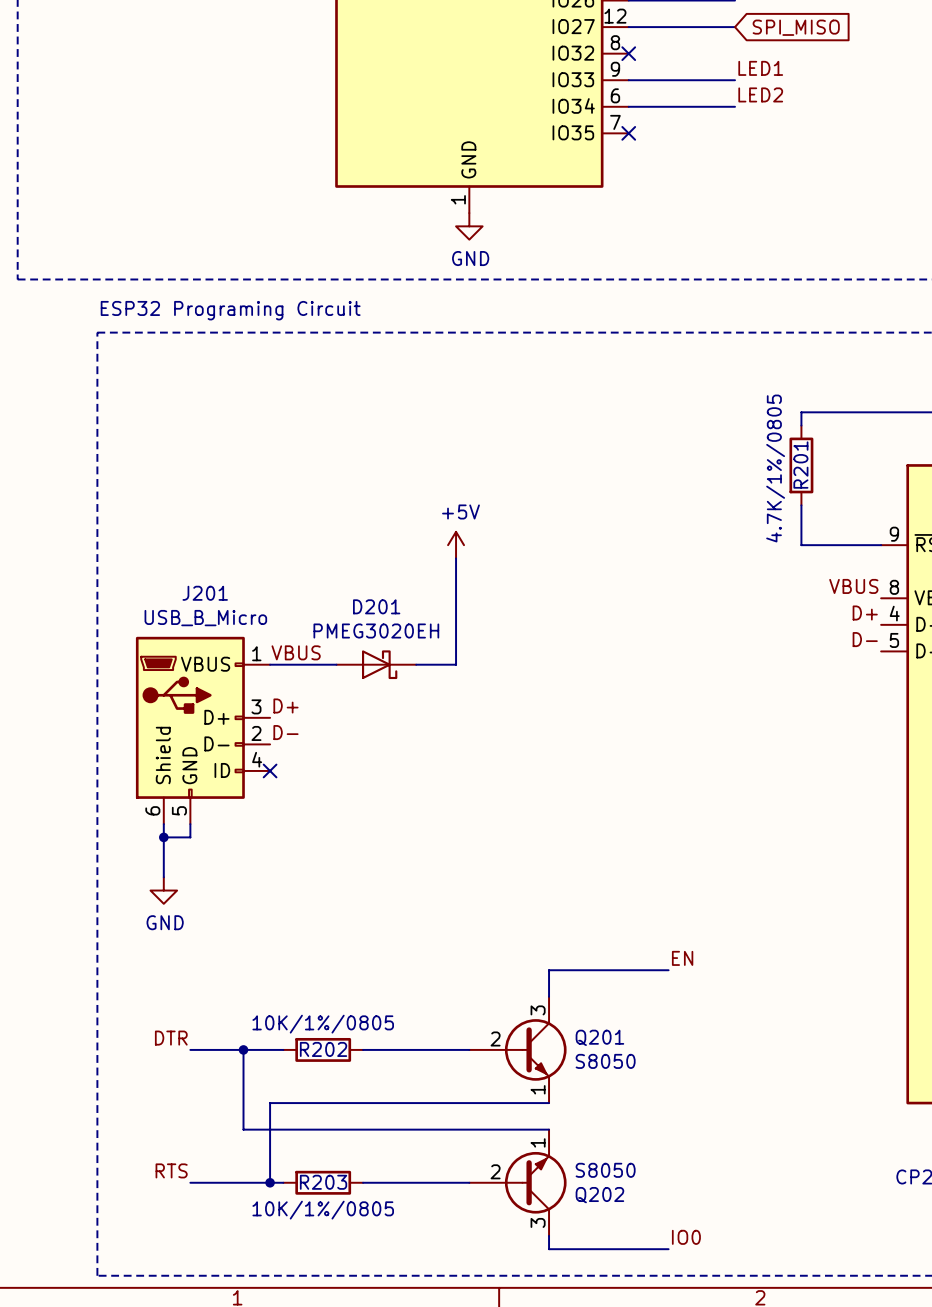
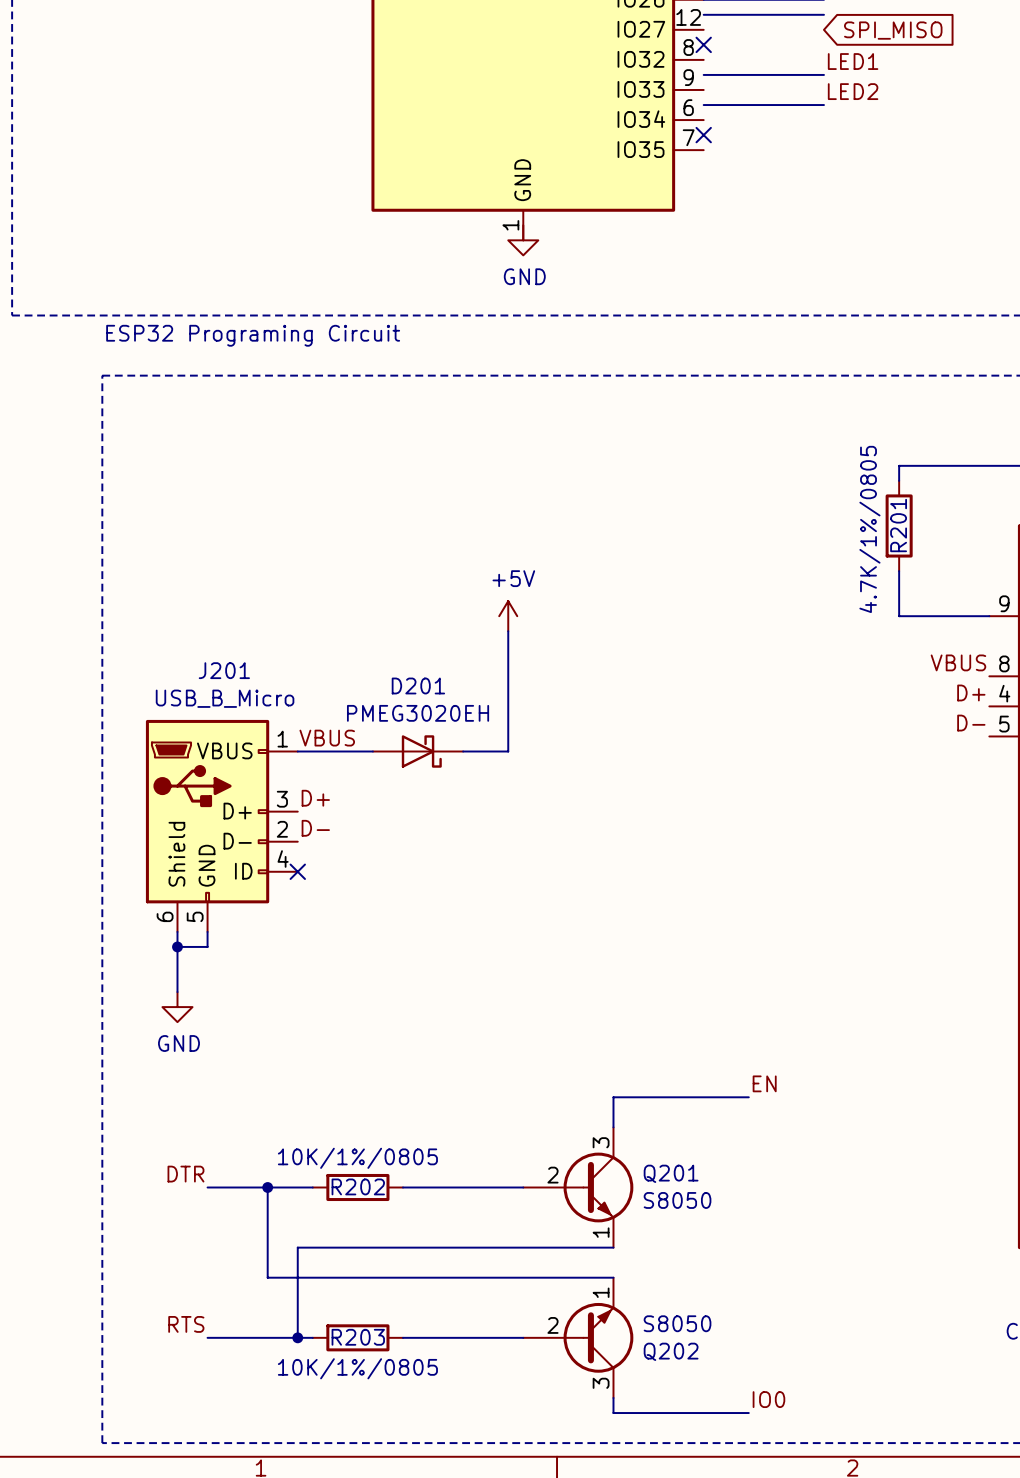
wire: (628, 27) (735, 27) -> (703, 14) (823, 14)
no-connect mark position: (628, 53) -> (703, 44)
label position: LED1 (760, 68) -> LED1 (853, 61)
wire: (628, 80) (735, 80) -> (703, 74) (823, 74)
label position: LED2 (760, 94) -> LED2 (853, 91)
wire: (628, 106) (735, 106) -> (703, 105) (823, 105)
no-connect mark position: (628, 133) -> (703, 135)
power symbol position: GND (469, 226) -> GND (523, 240)
text position: ESP32 Programing Circuit (230, 310) -> ESP32 Programing Circuit (253, 335)

